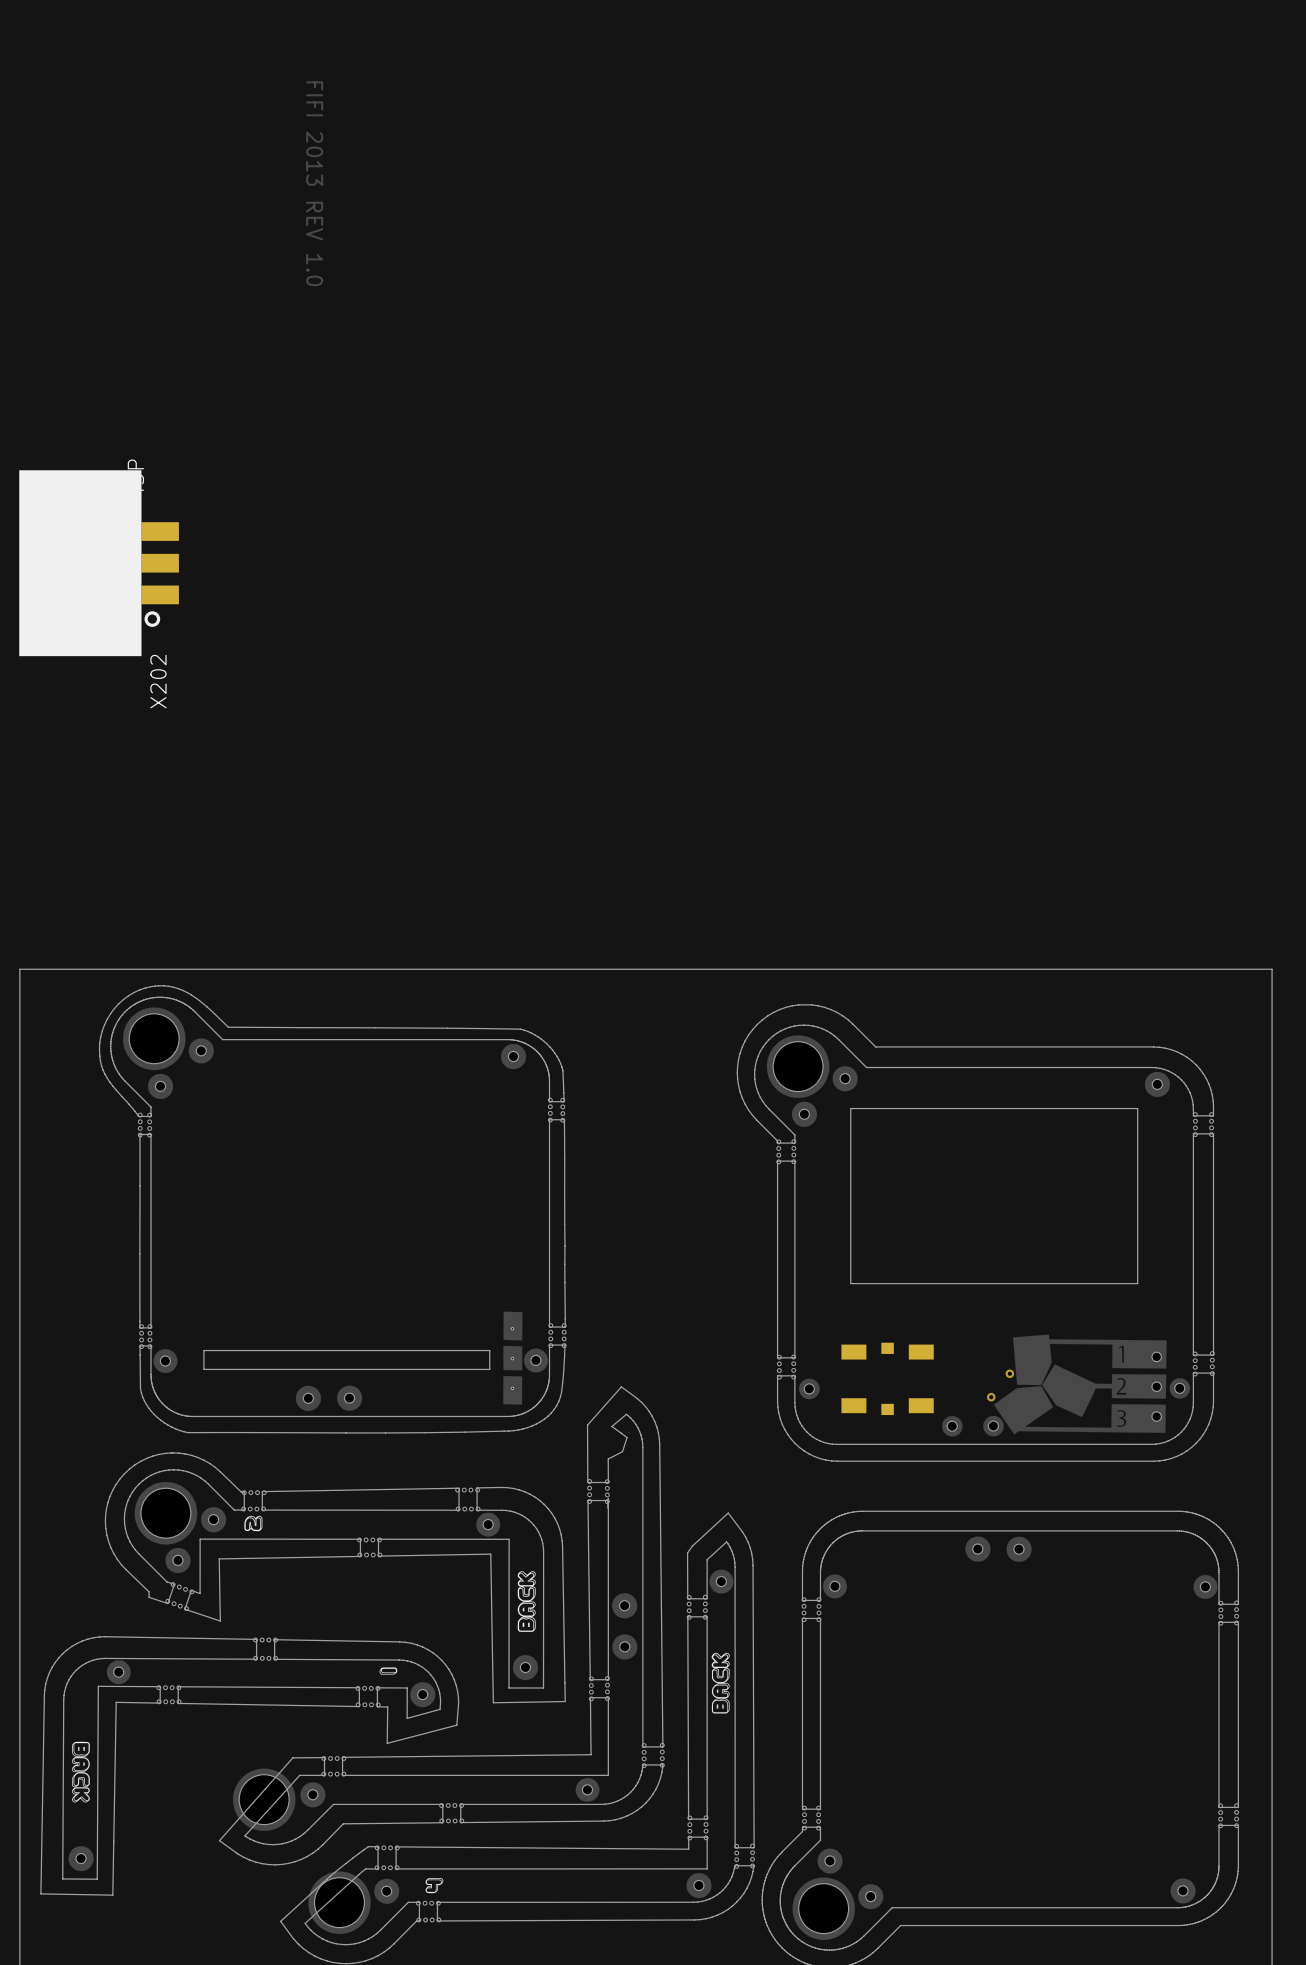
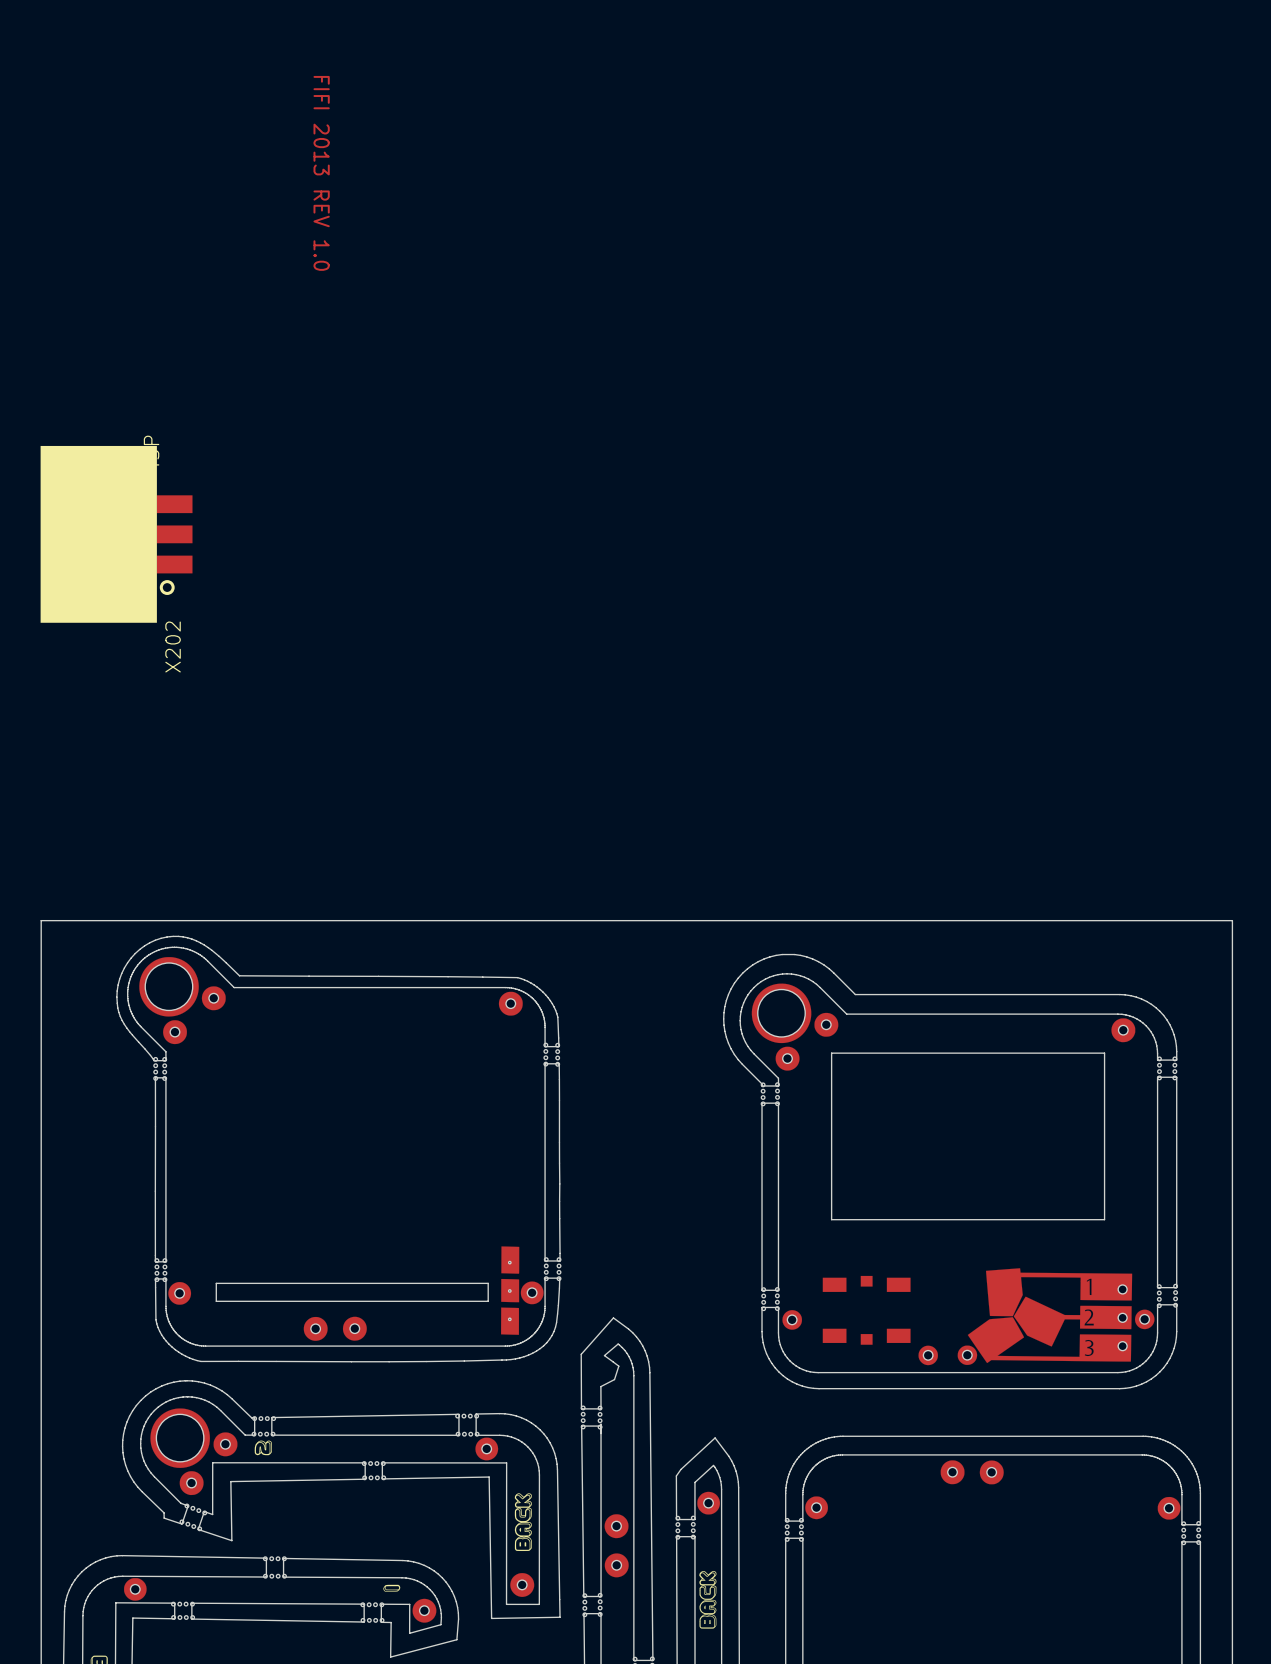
via: (1009, 1373) -> none
via: (991, 1397) -> none

